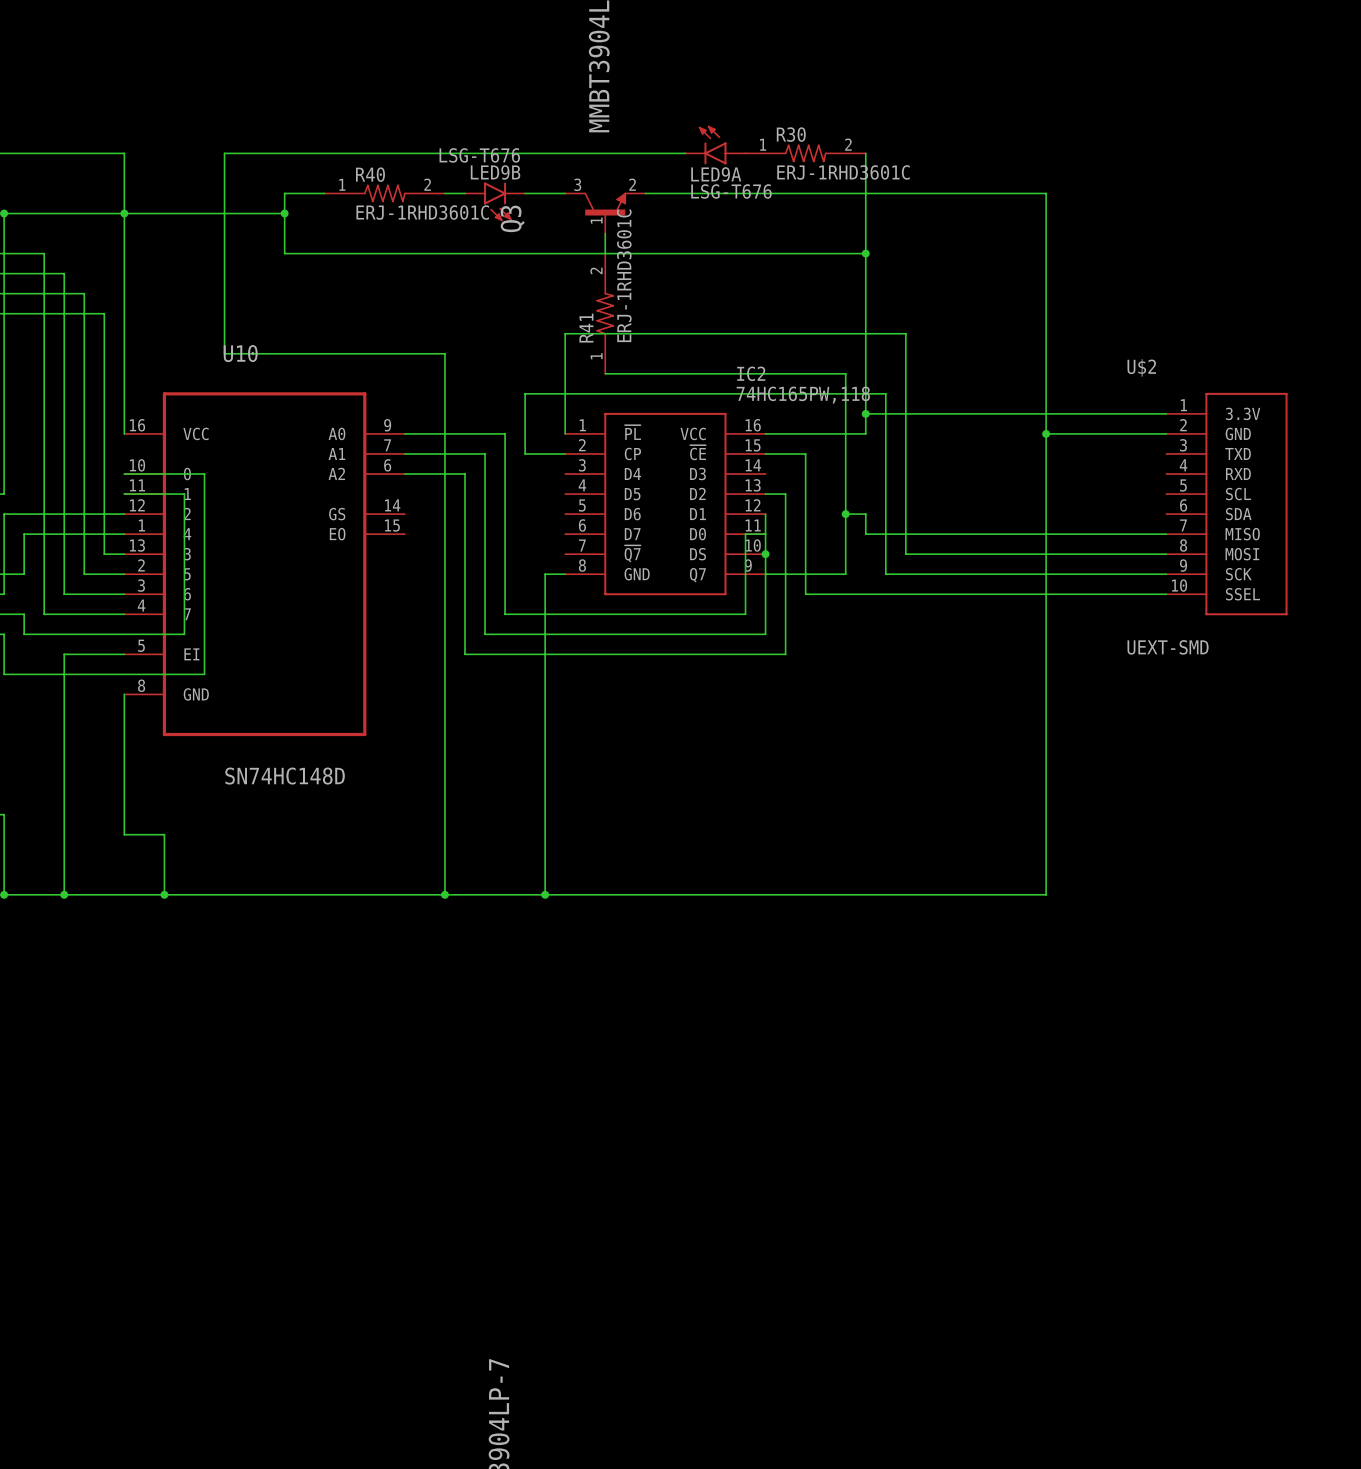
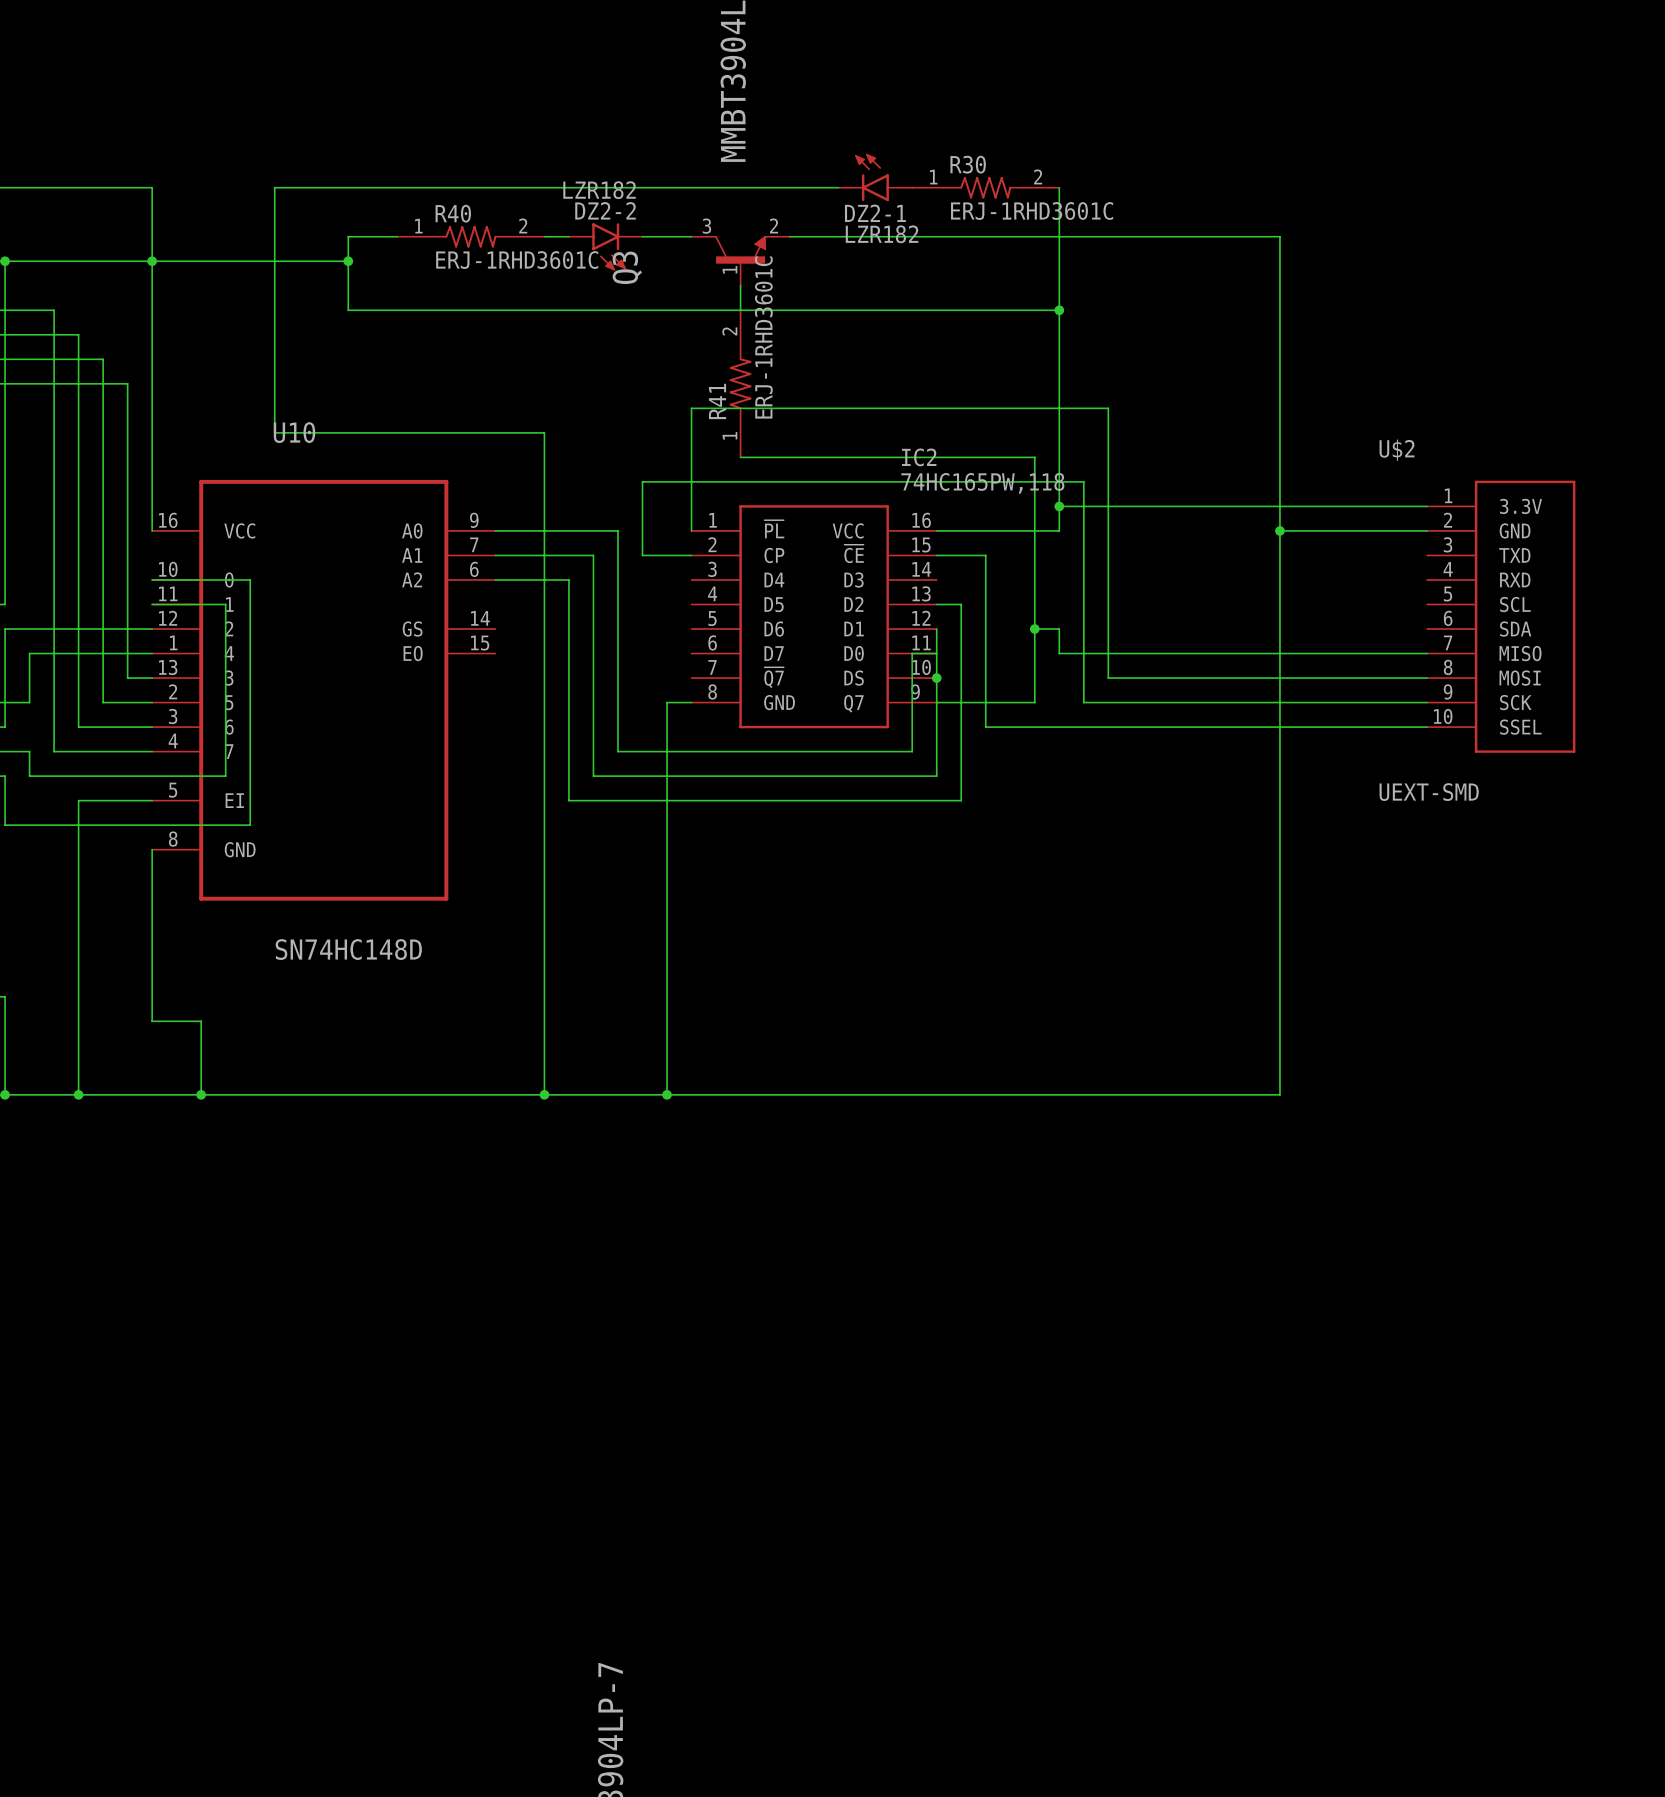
LED9B value: LSG-T676 (479, 155) -> LZR182 (599, 190)
LED9B name: LED9B (495, 172) -> DZ2-2 (605, 210)
LED9A name: LED9A (716, 174) -> DZ2-1 (875, 213)
LED9A value: LSG-T676 (731, 191) -> LZR182 (882, 234)

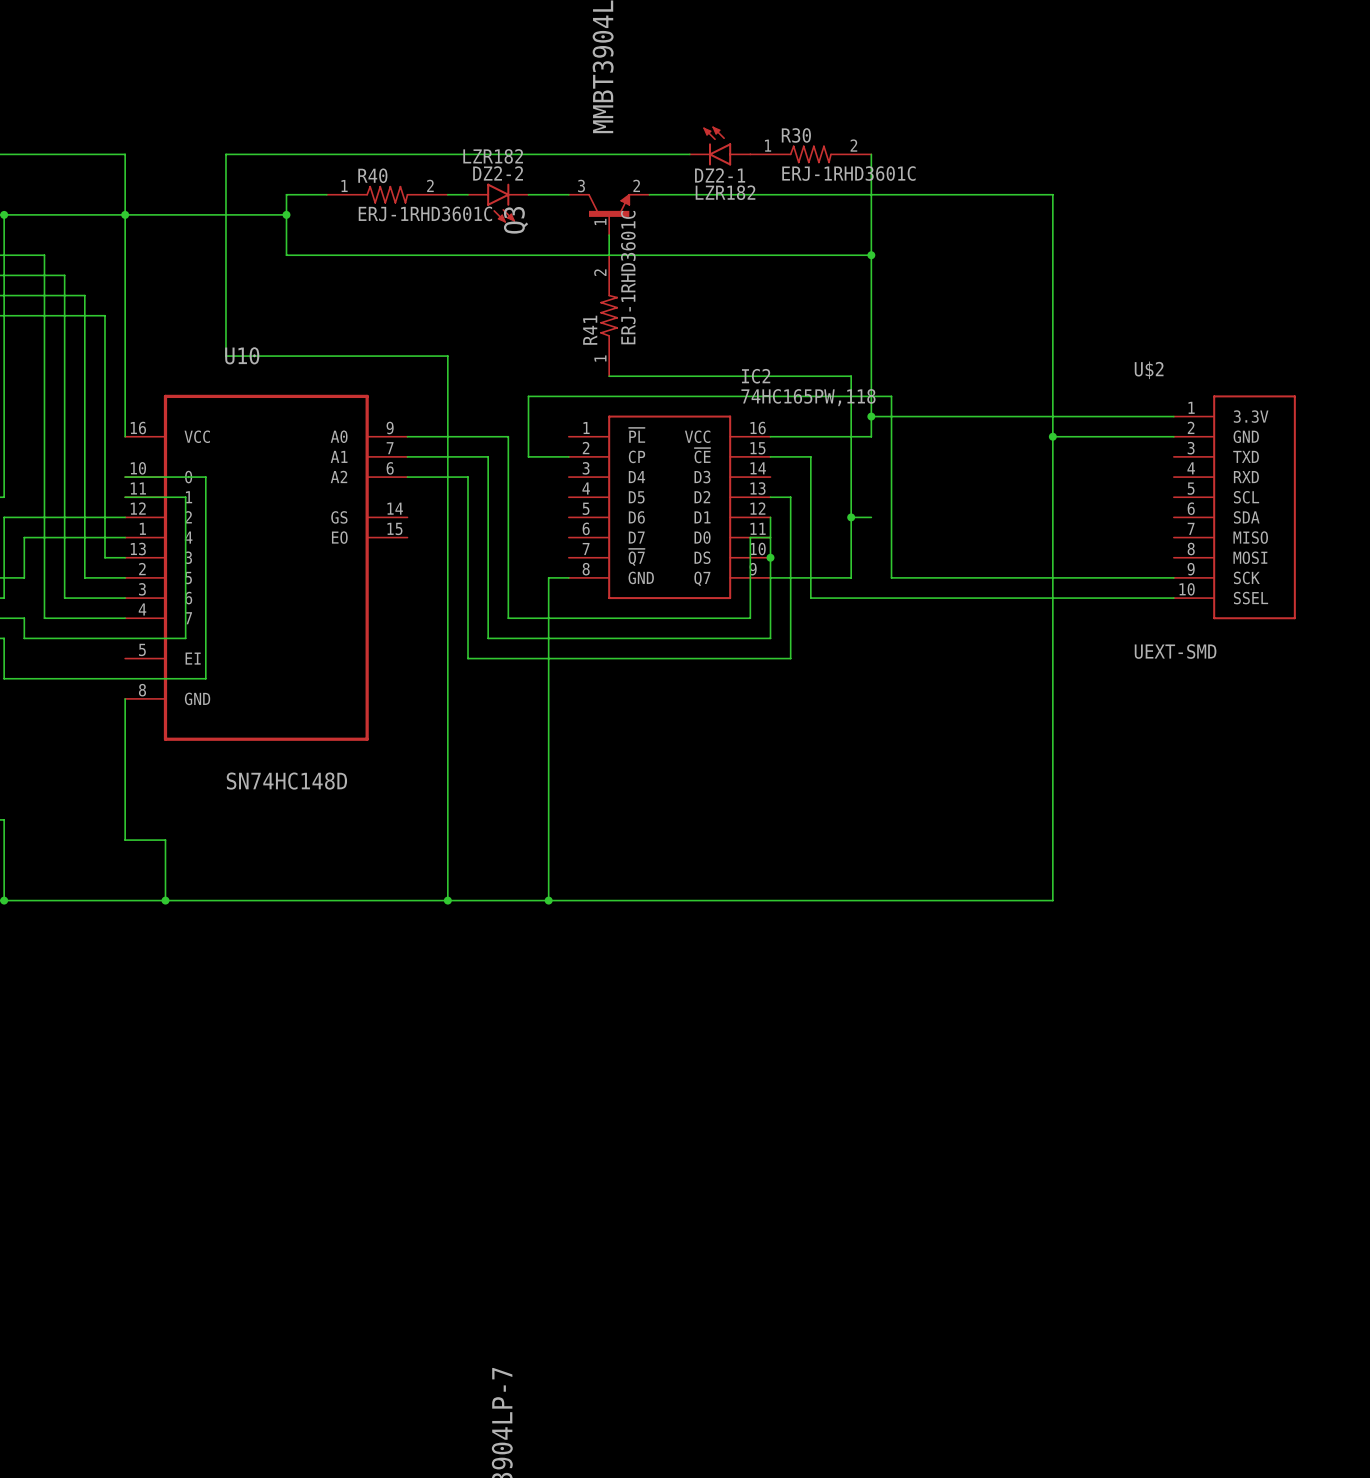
wire: (691, 530) (691, 408) (1108, 408) (1108, 678) (1427, 678) -> none
wire: (1059, 629) (1059, 653) (1427, 653) -> none
wire: (152, 800) (78, 800) (78, 1094) -> none
junction: (78, 1094) -> none

